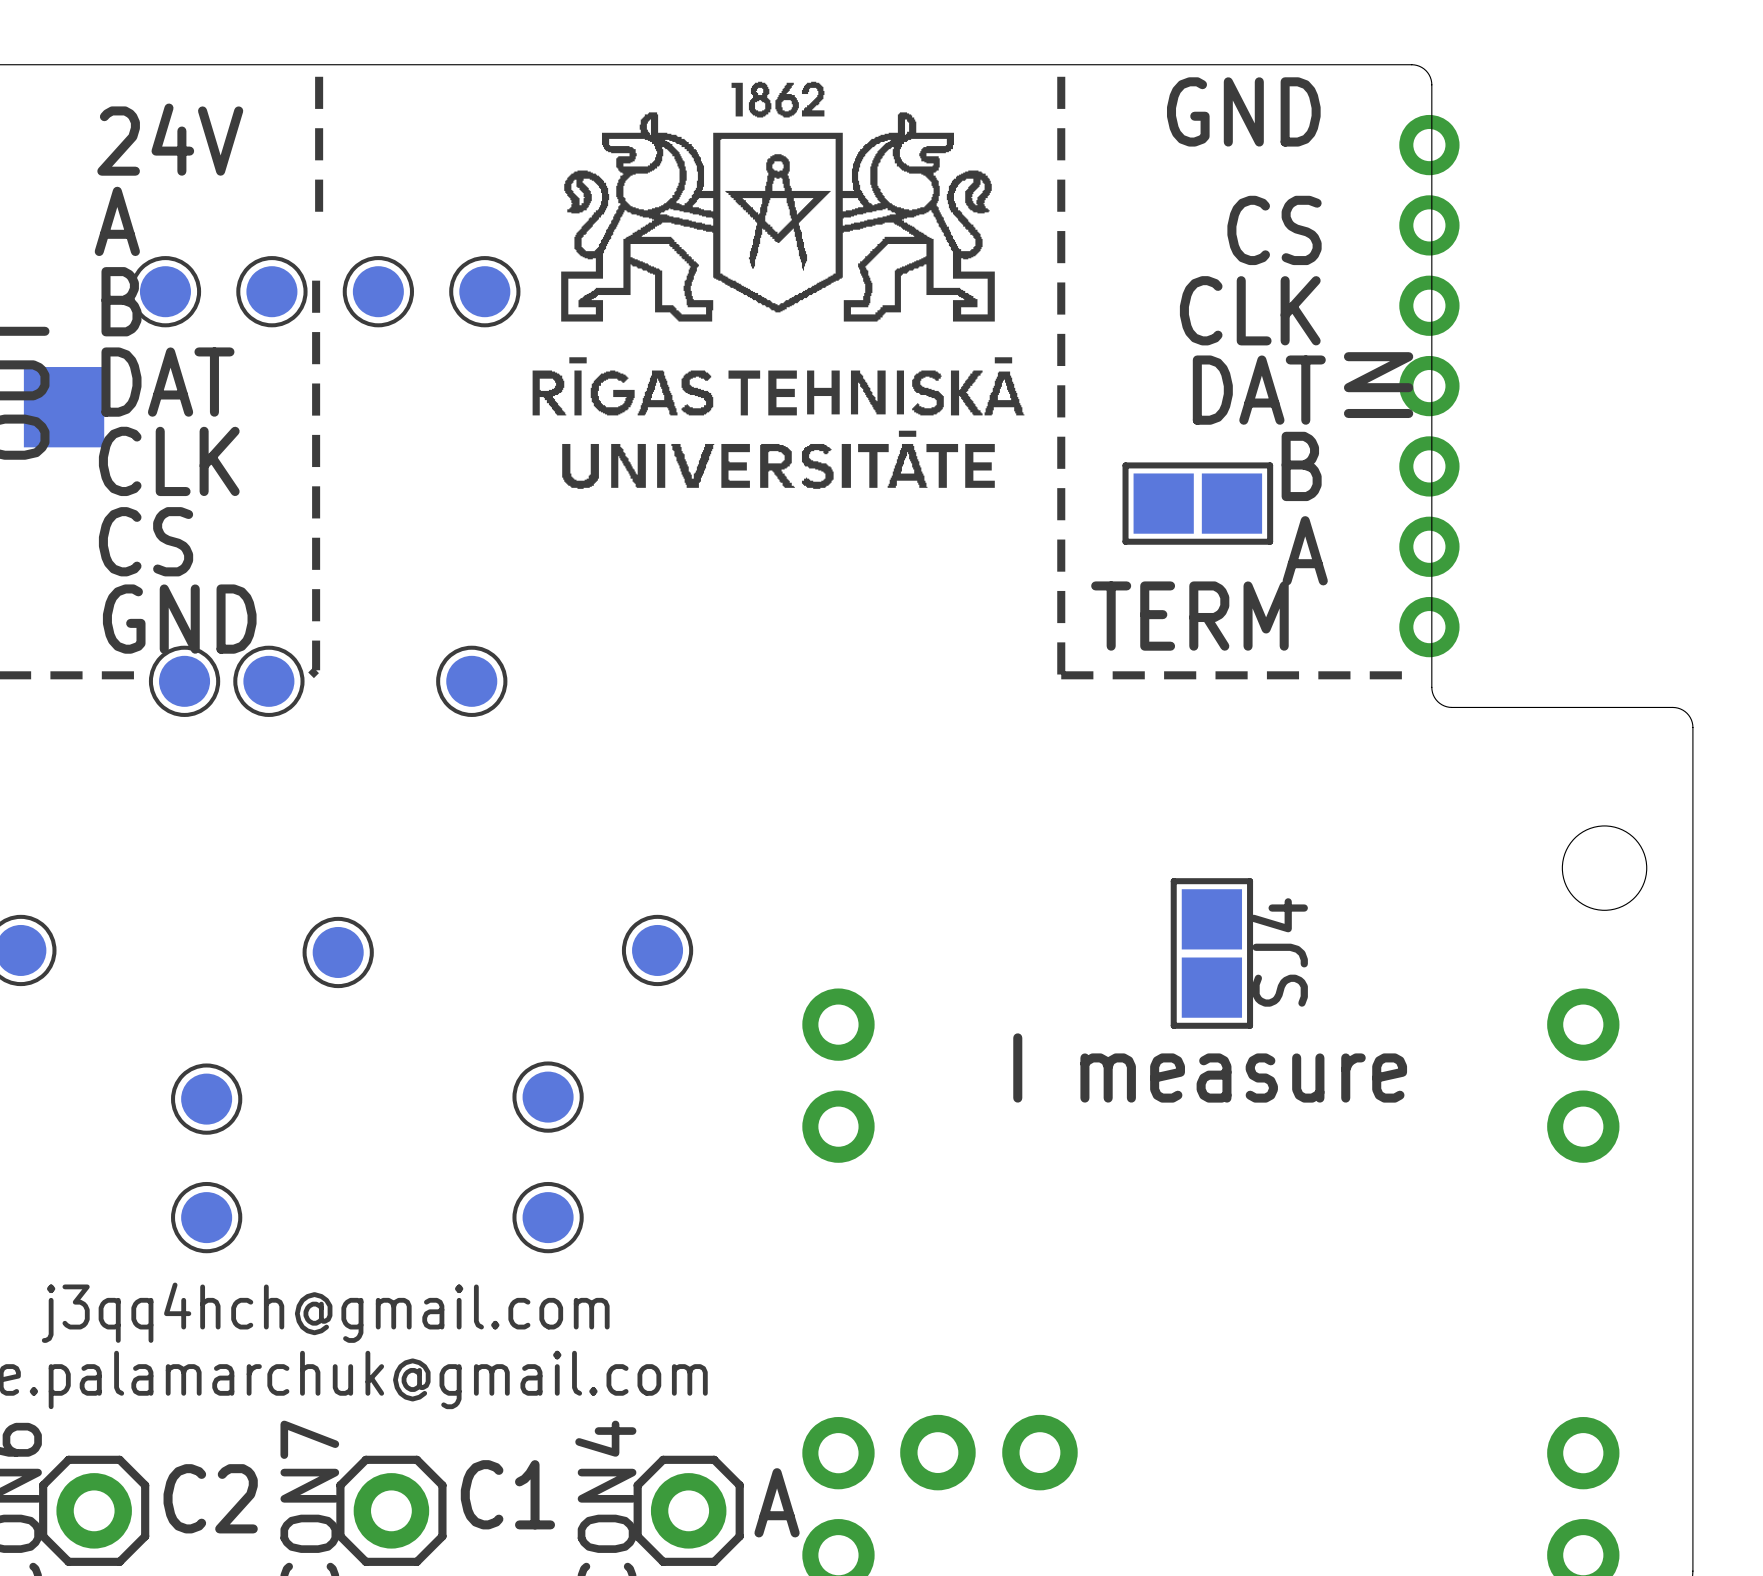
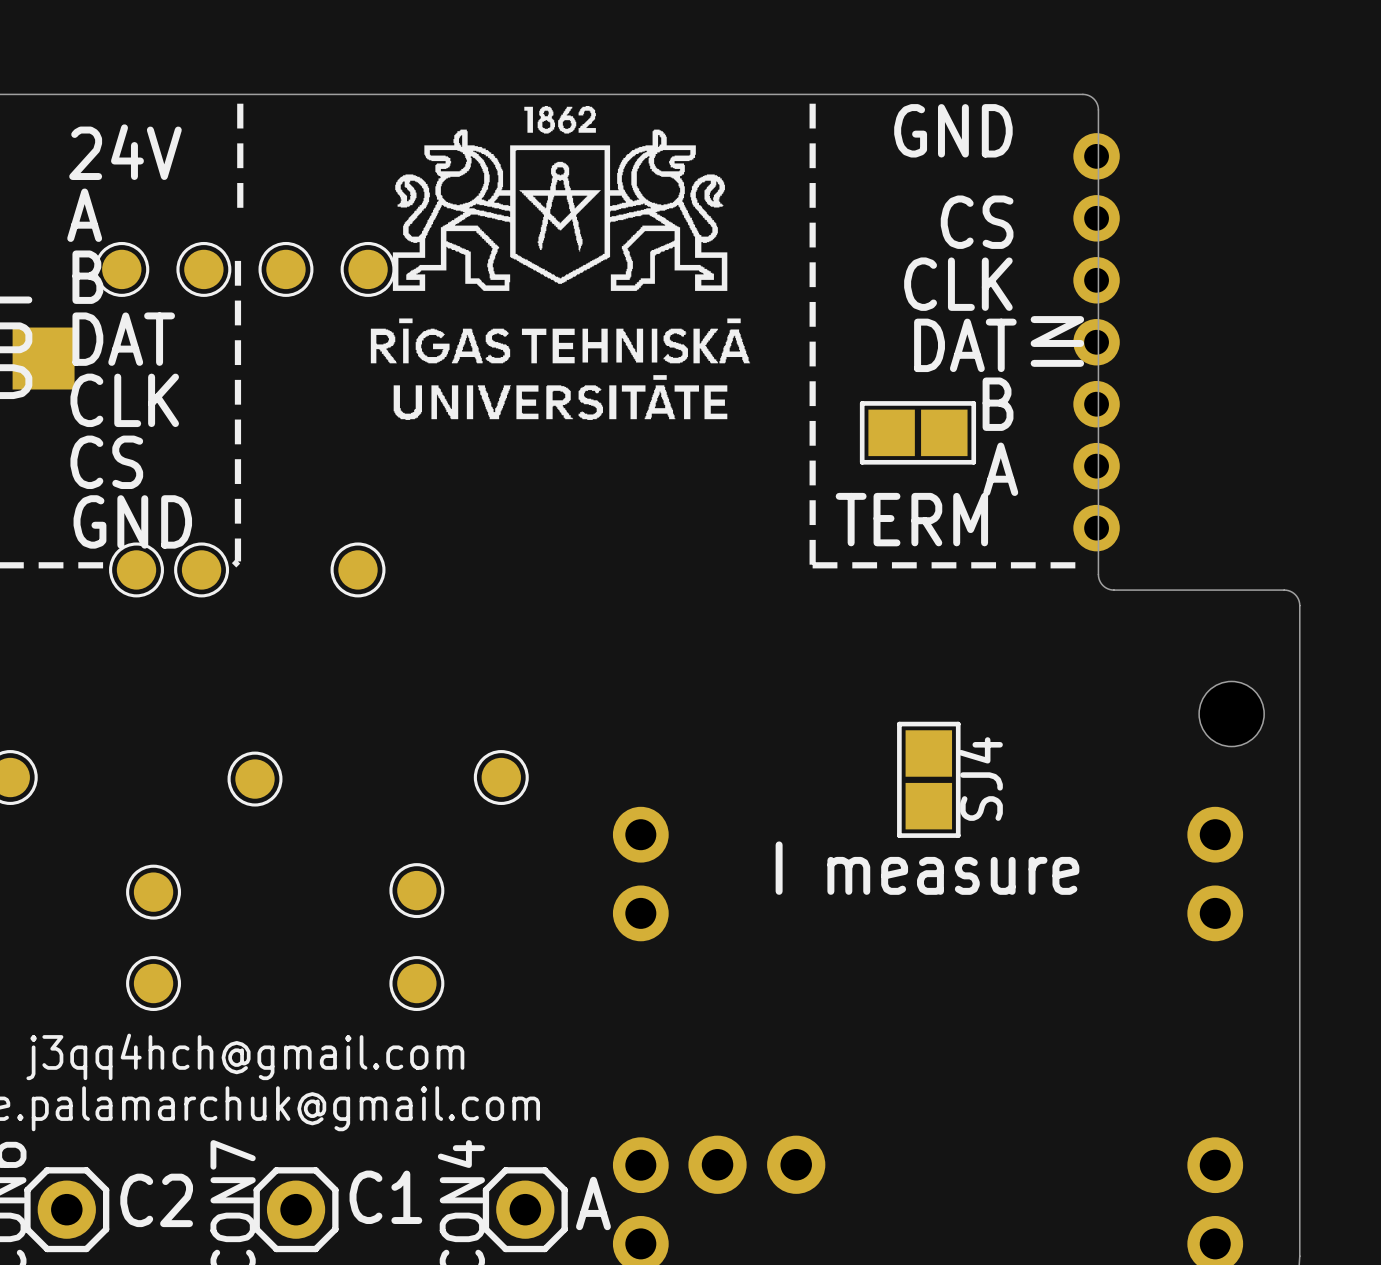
drawing position: (778, 285) -> (560, 262)

